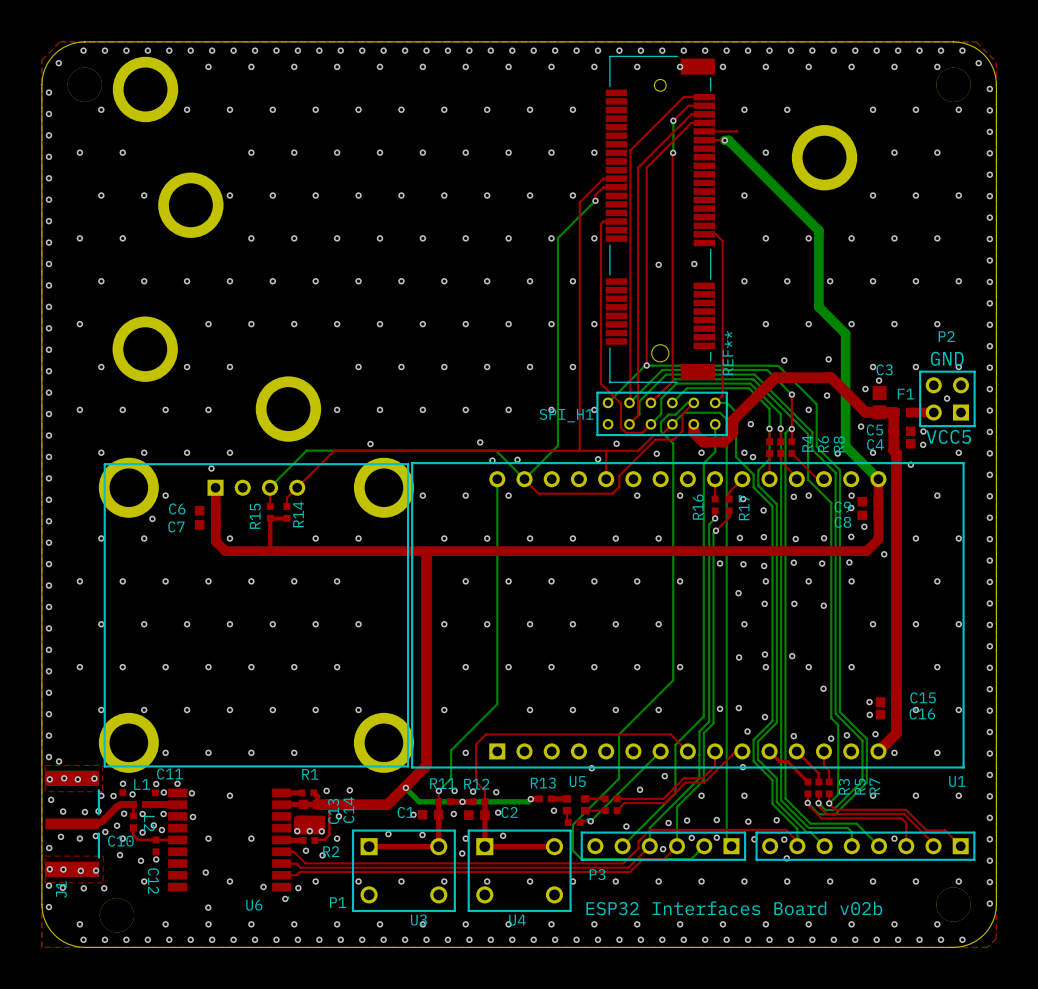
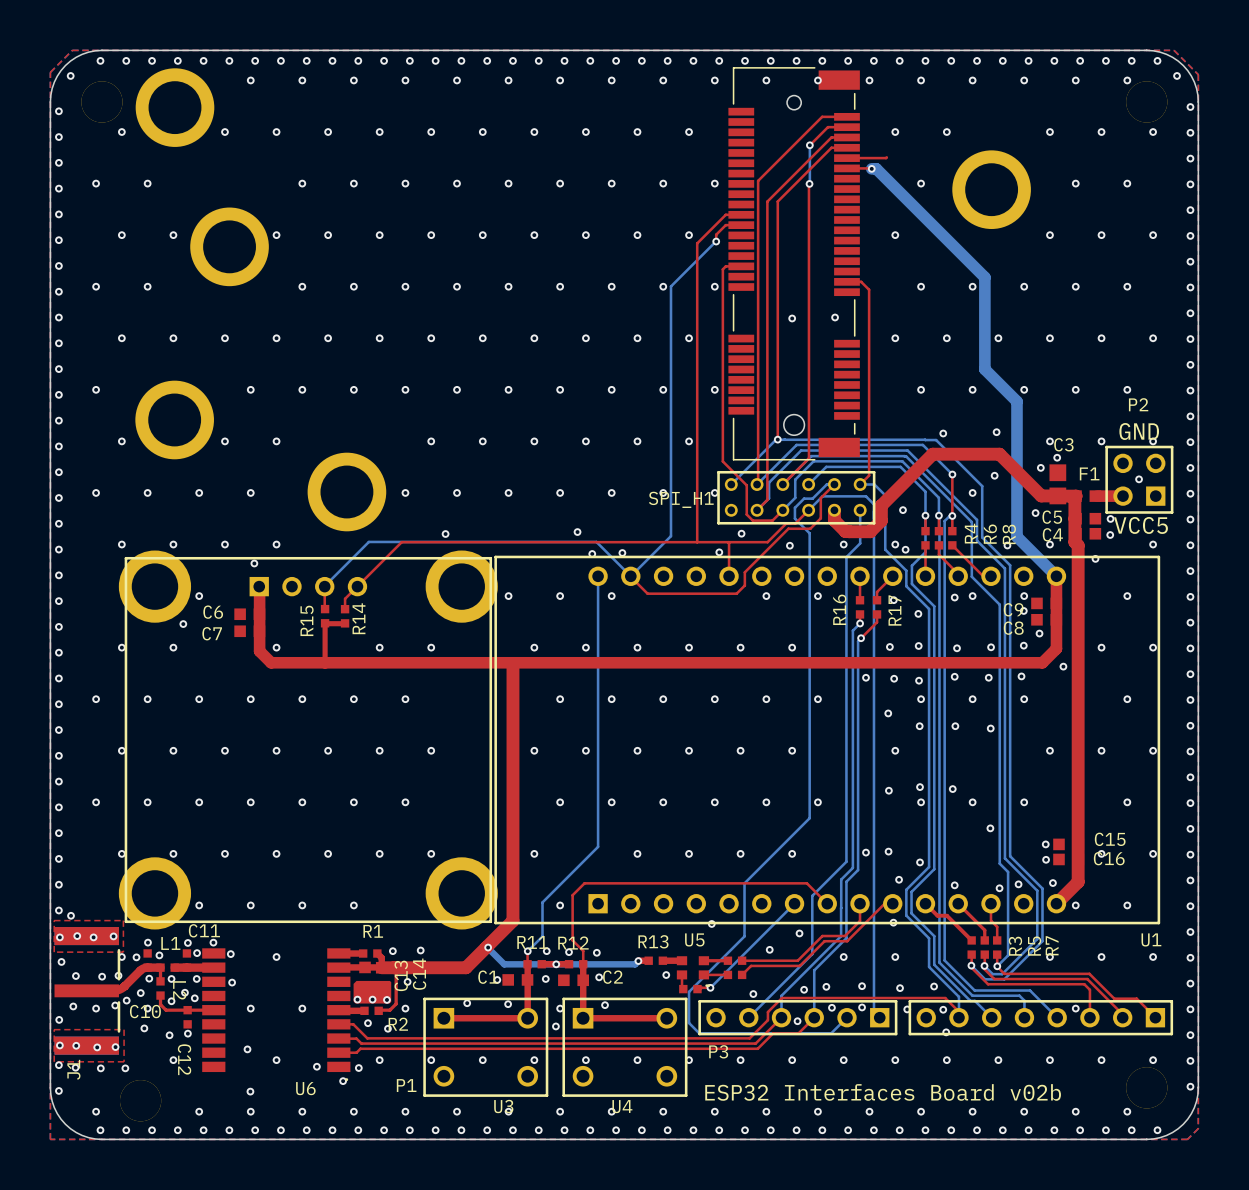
REF** name: REF** (727, 352) -> none

